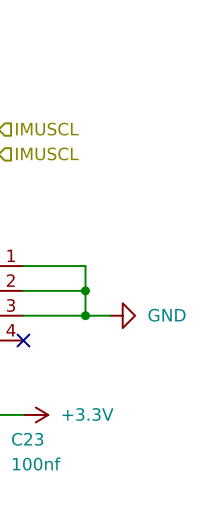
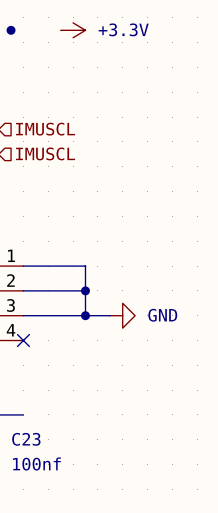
junction: none -> (11, 30)
power symbol: none -> +3.3V (73, 30)
power symbol: +3.3V (35, 414) -> none

